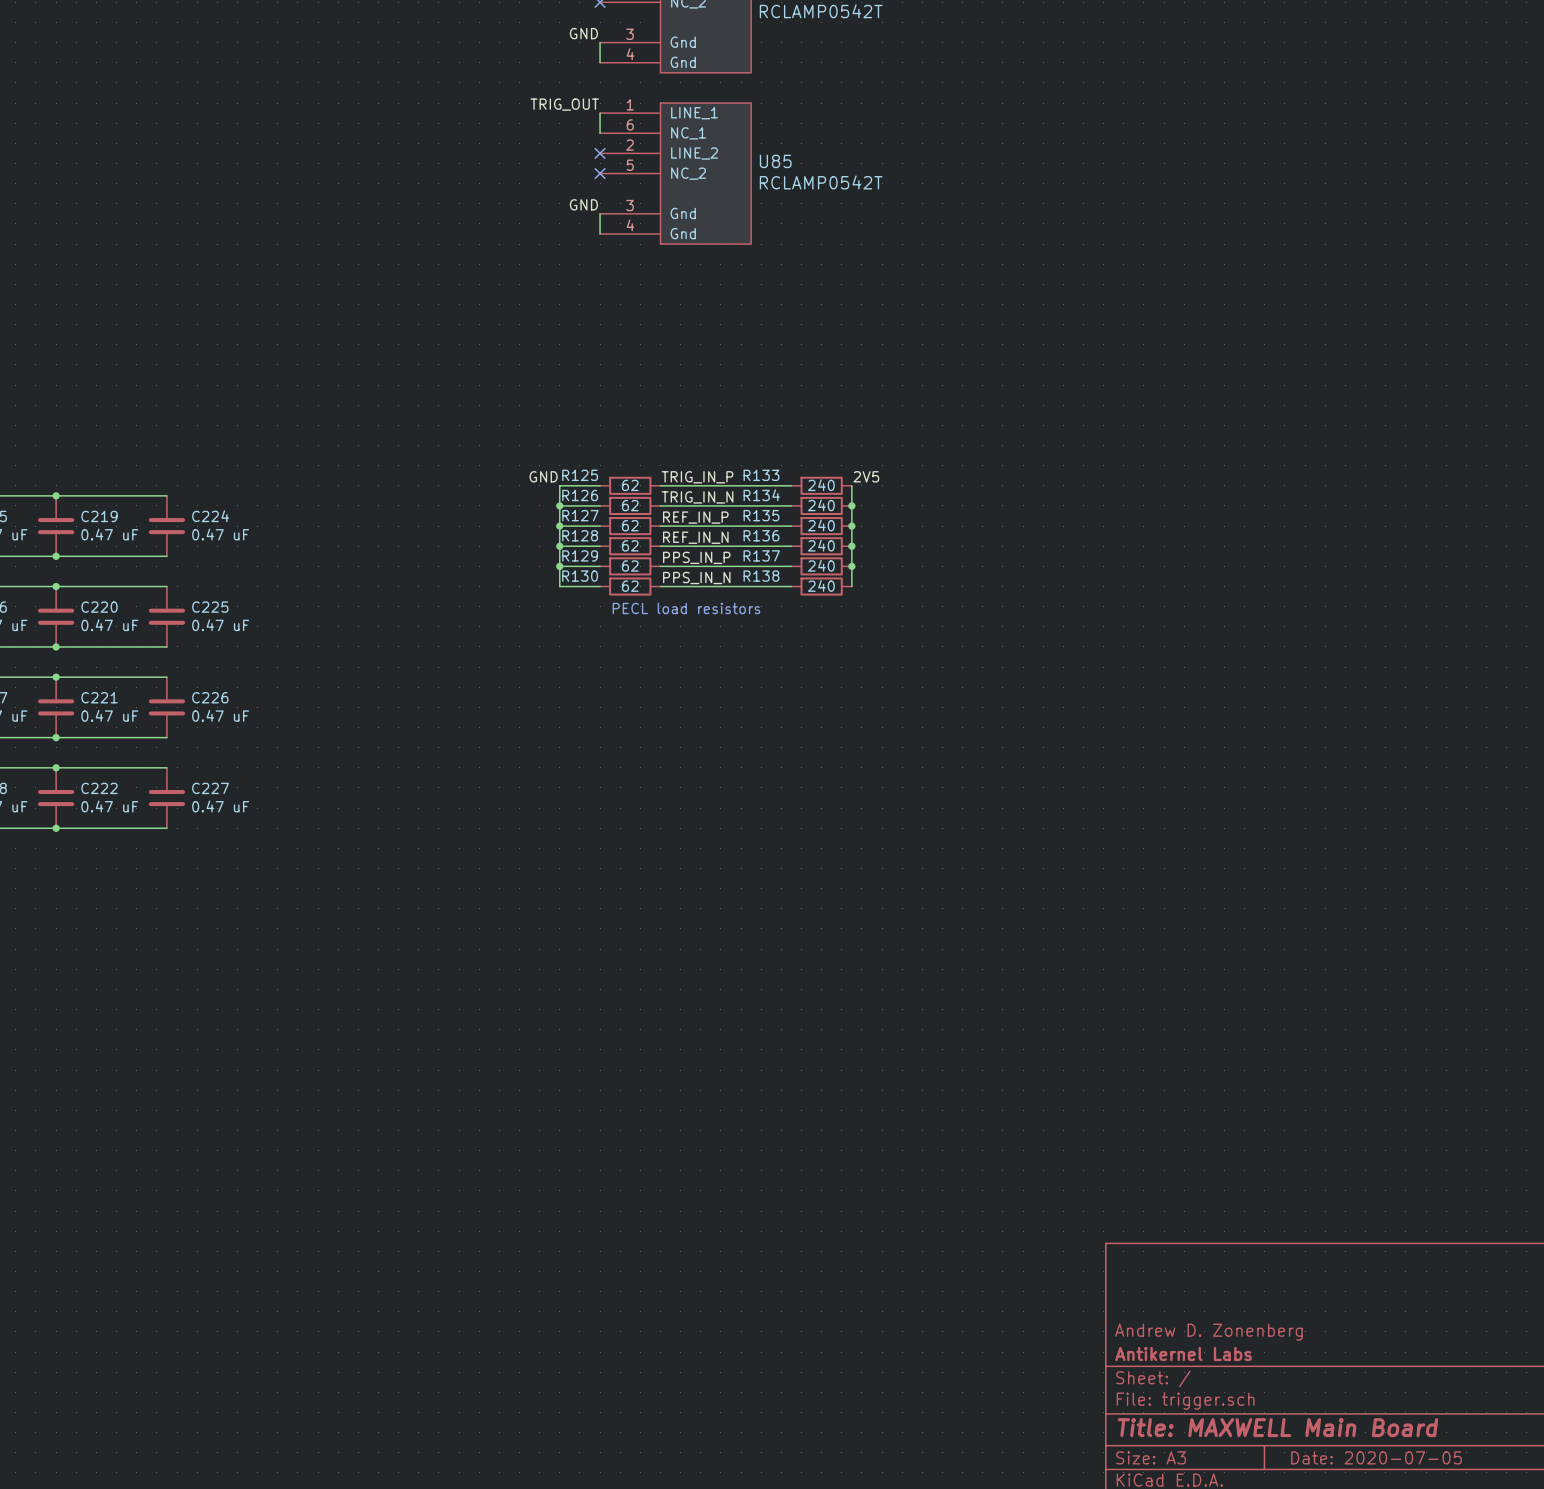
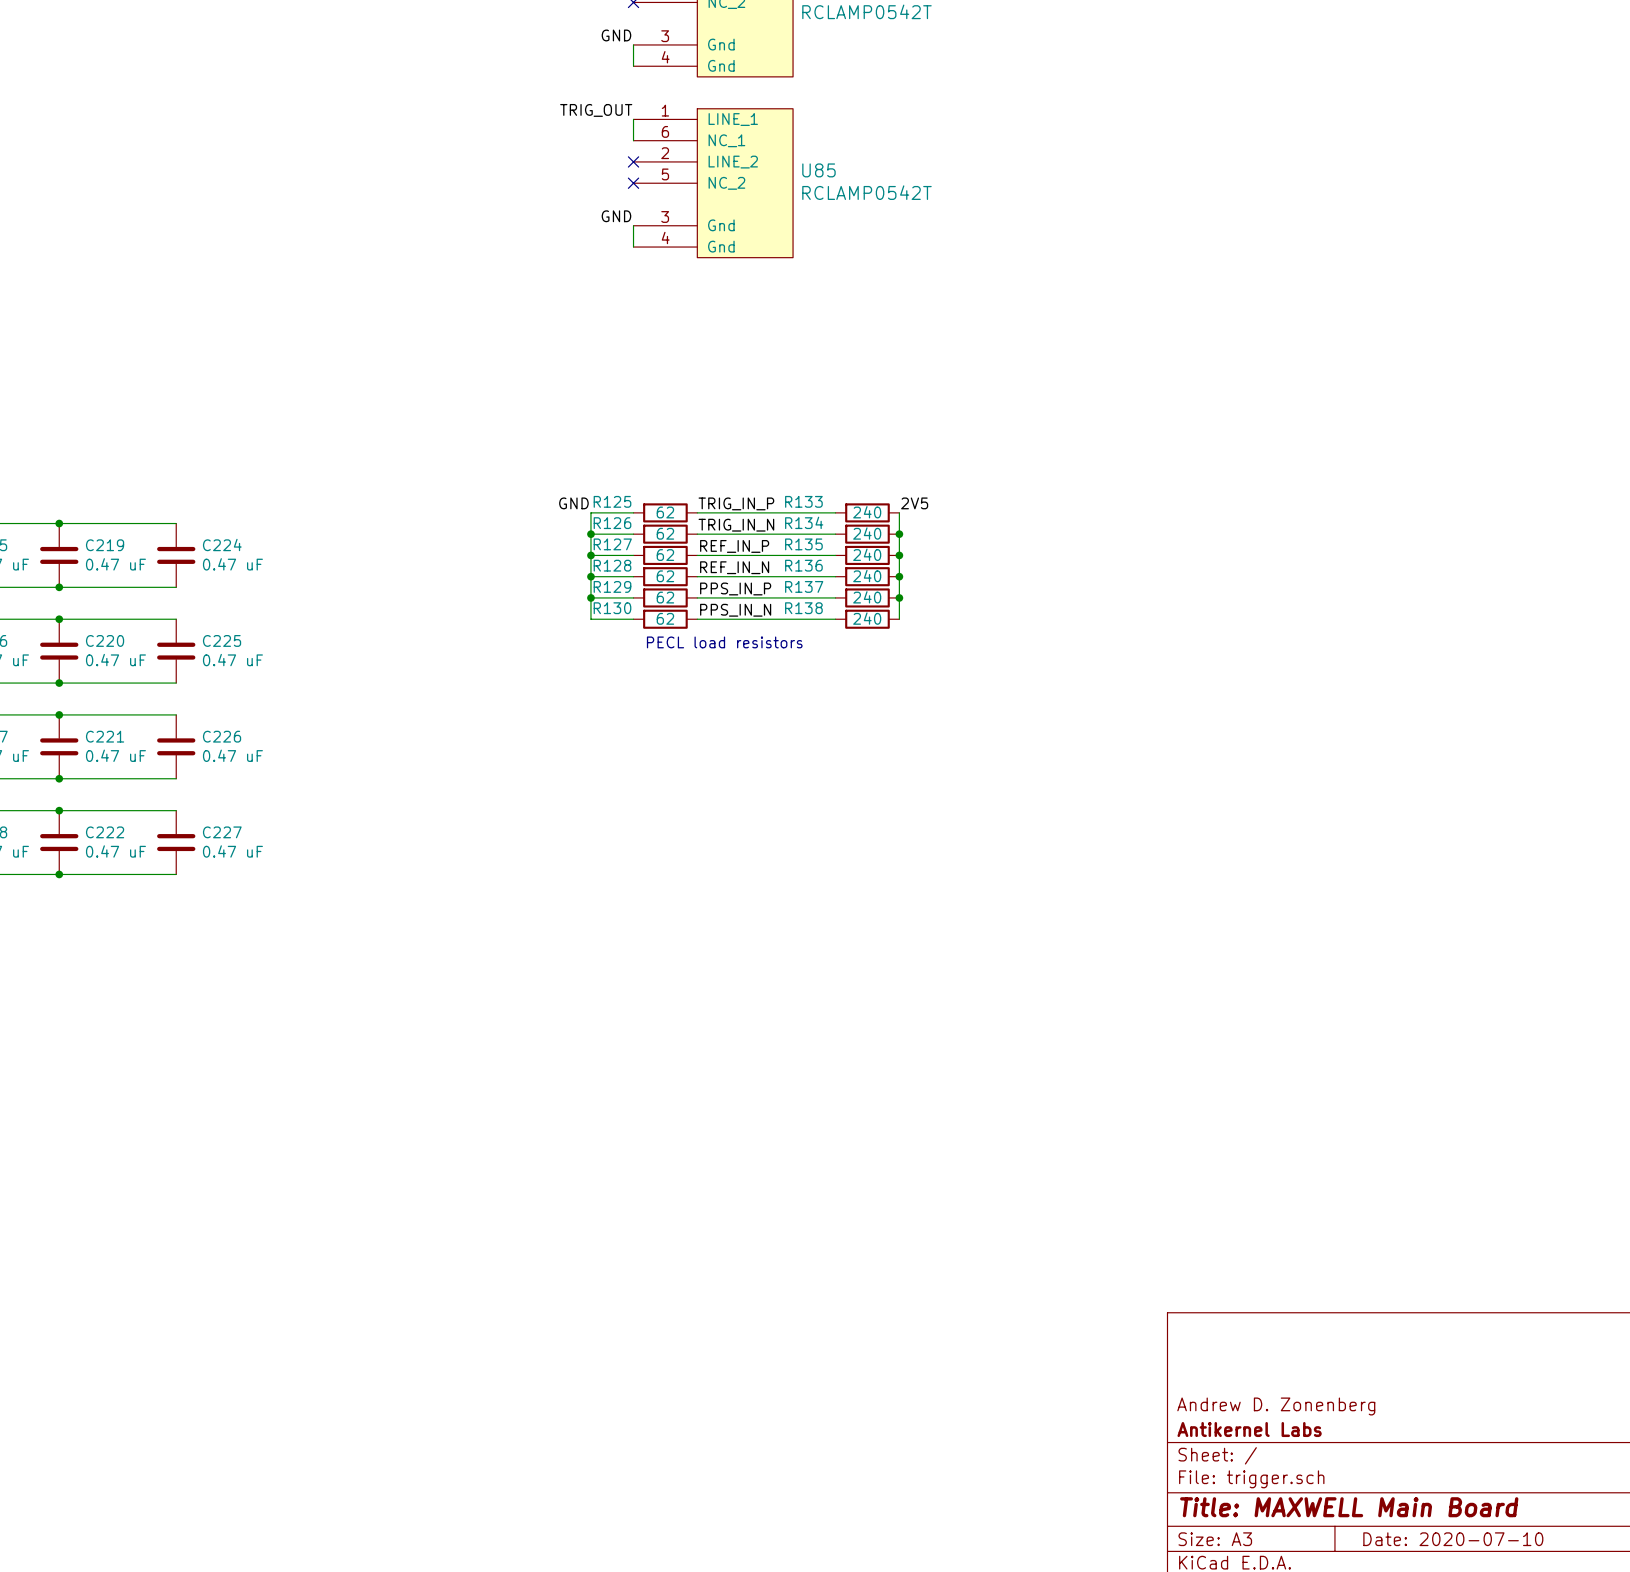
title block: Date: 2020-07-05 (1376, 1457) -> Date: 2020-07-10 (1453, 1539)

